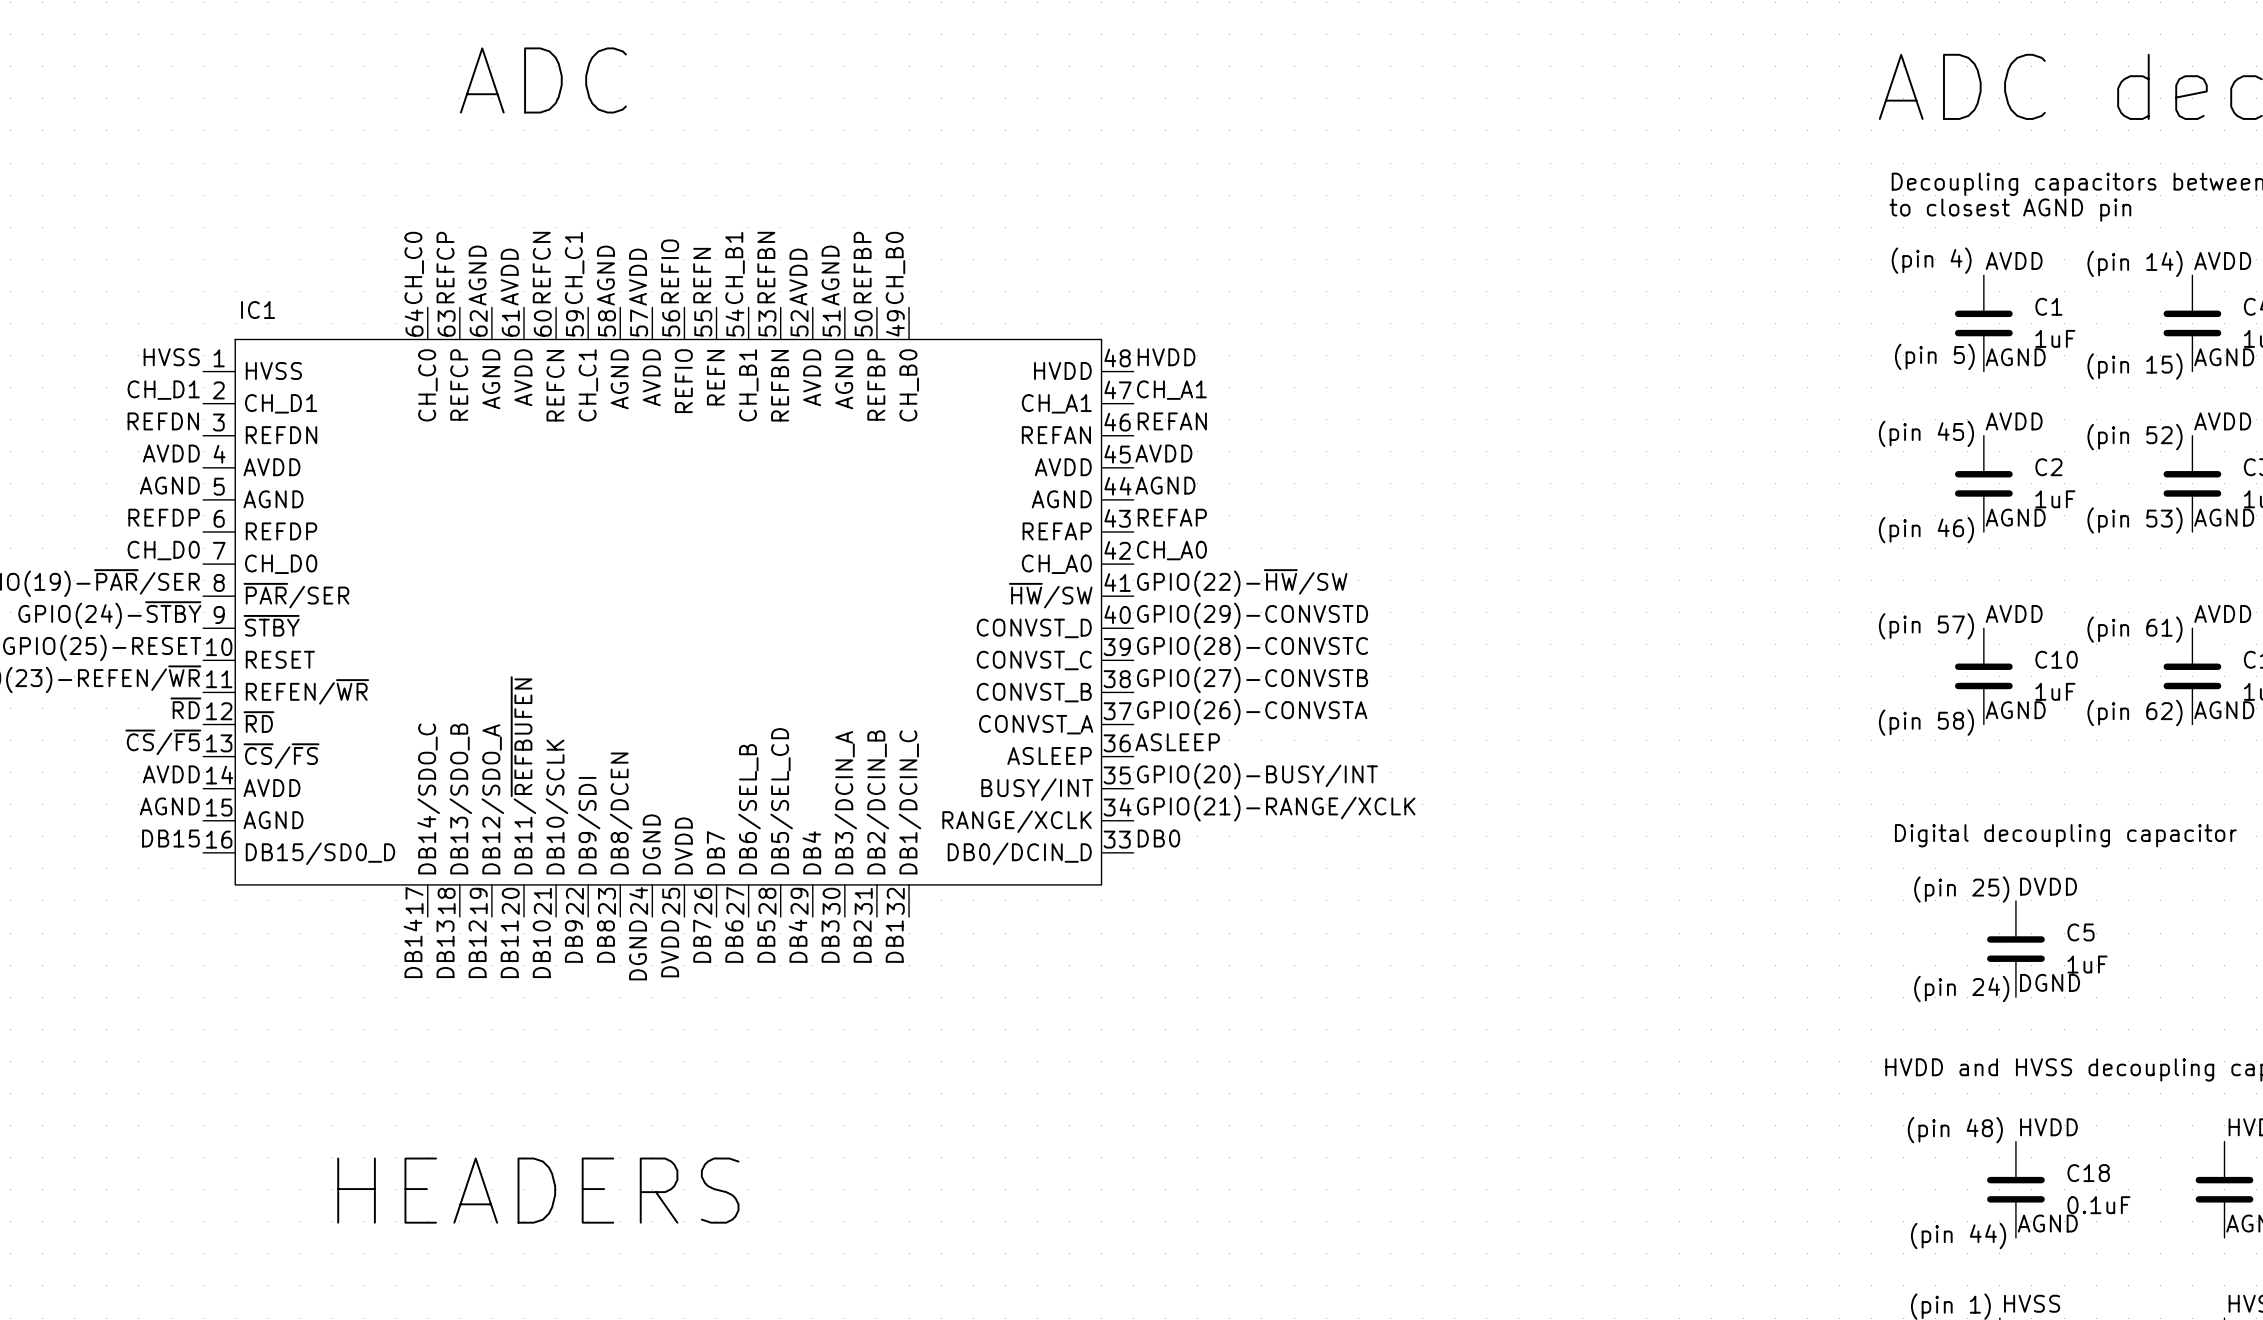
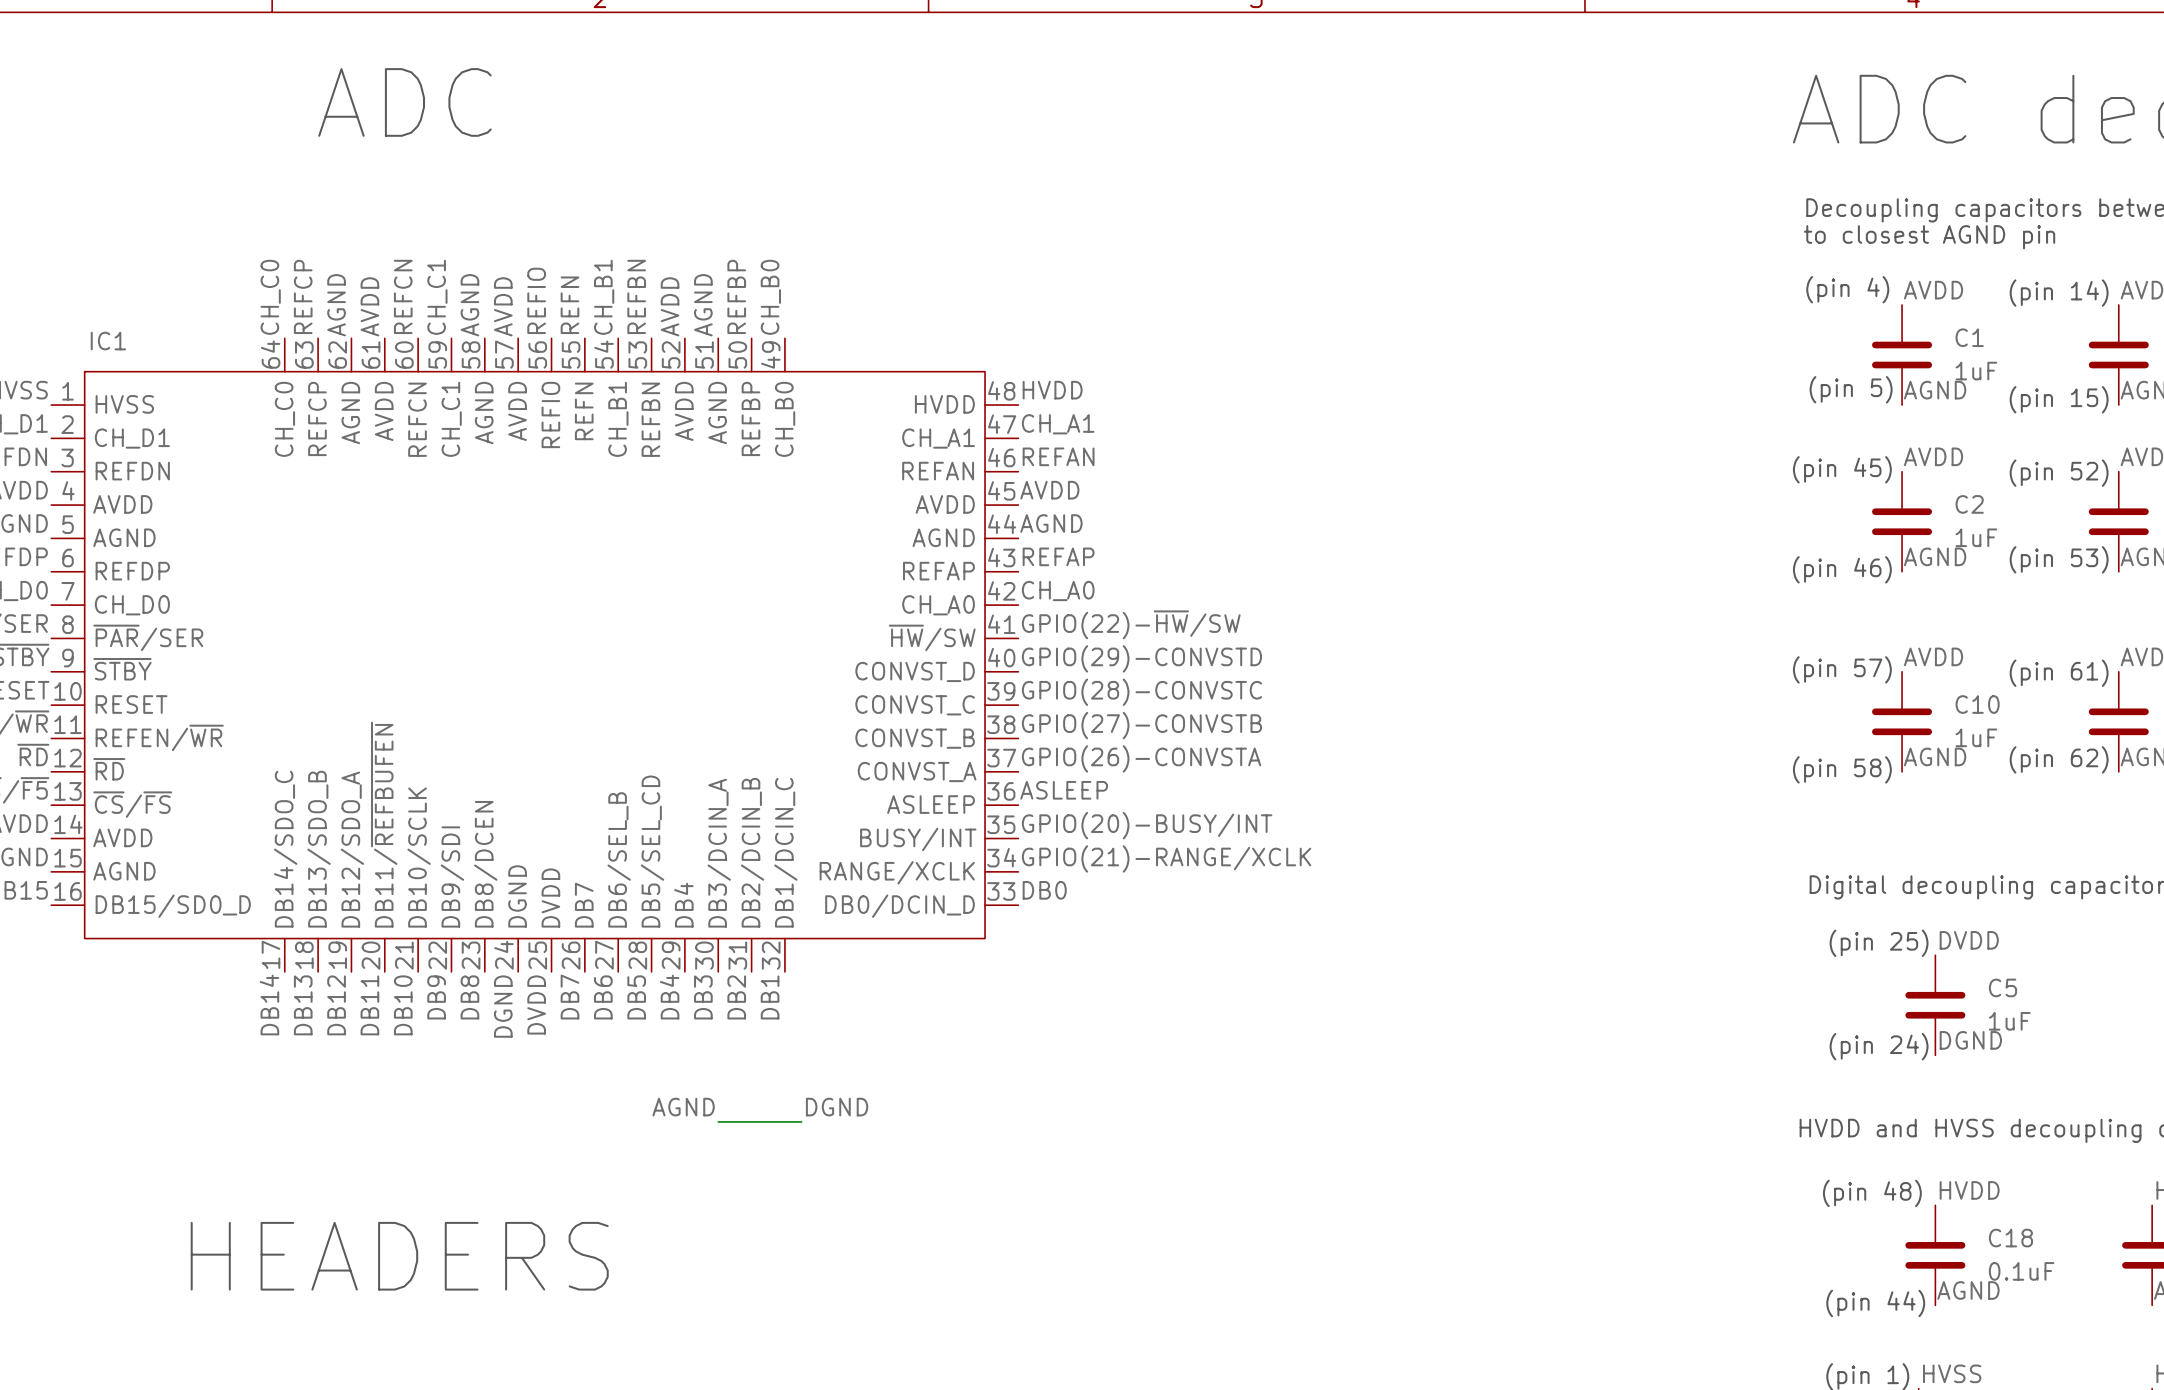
label: none -> AGND (683, 1107)
label: none -> DGND (837, 1107)
wire: none -> (718, 1121) (801, 1121)

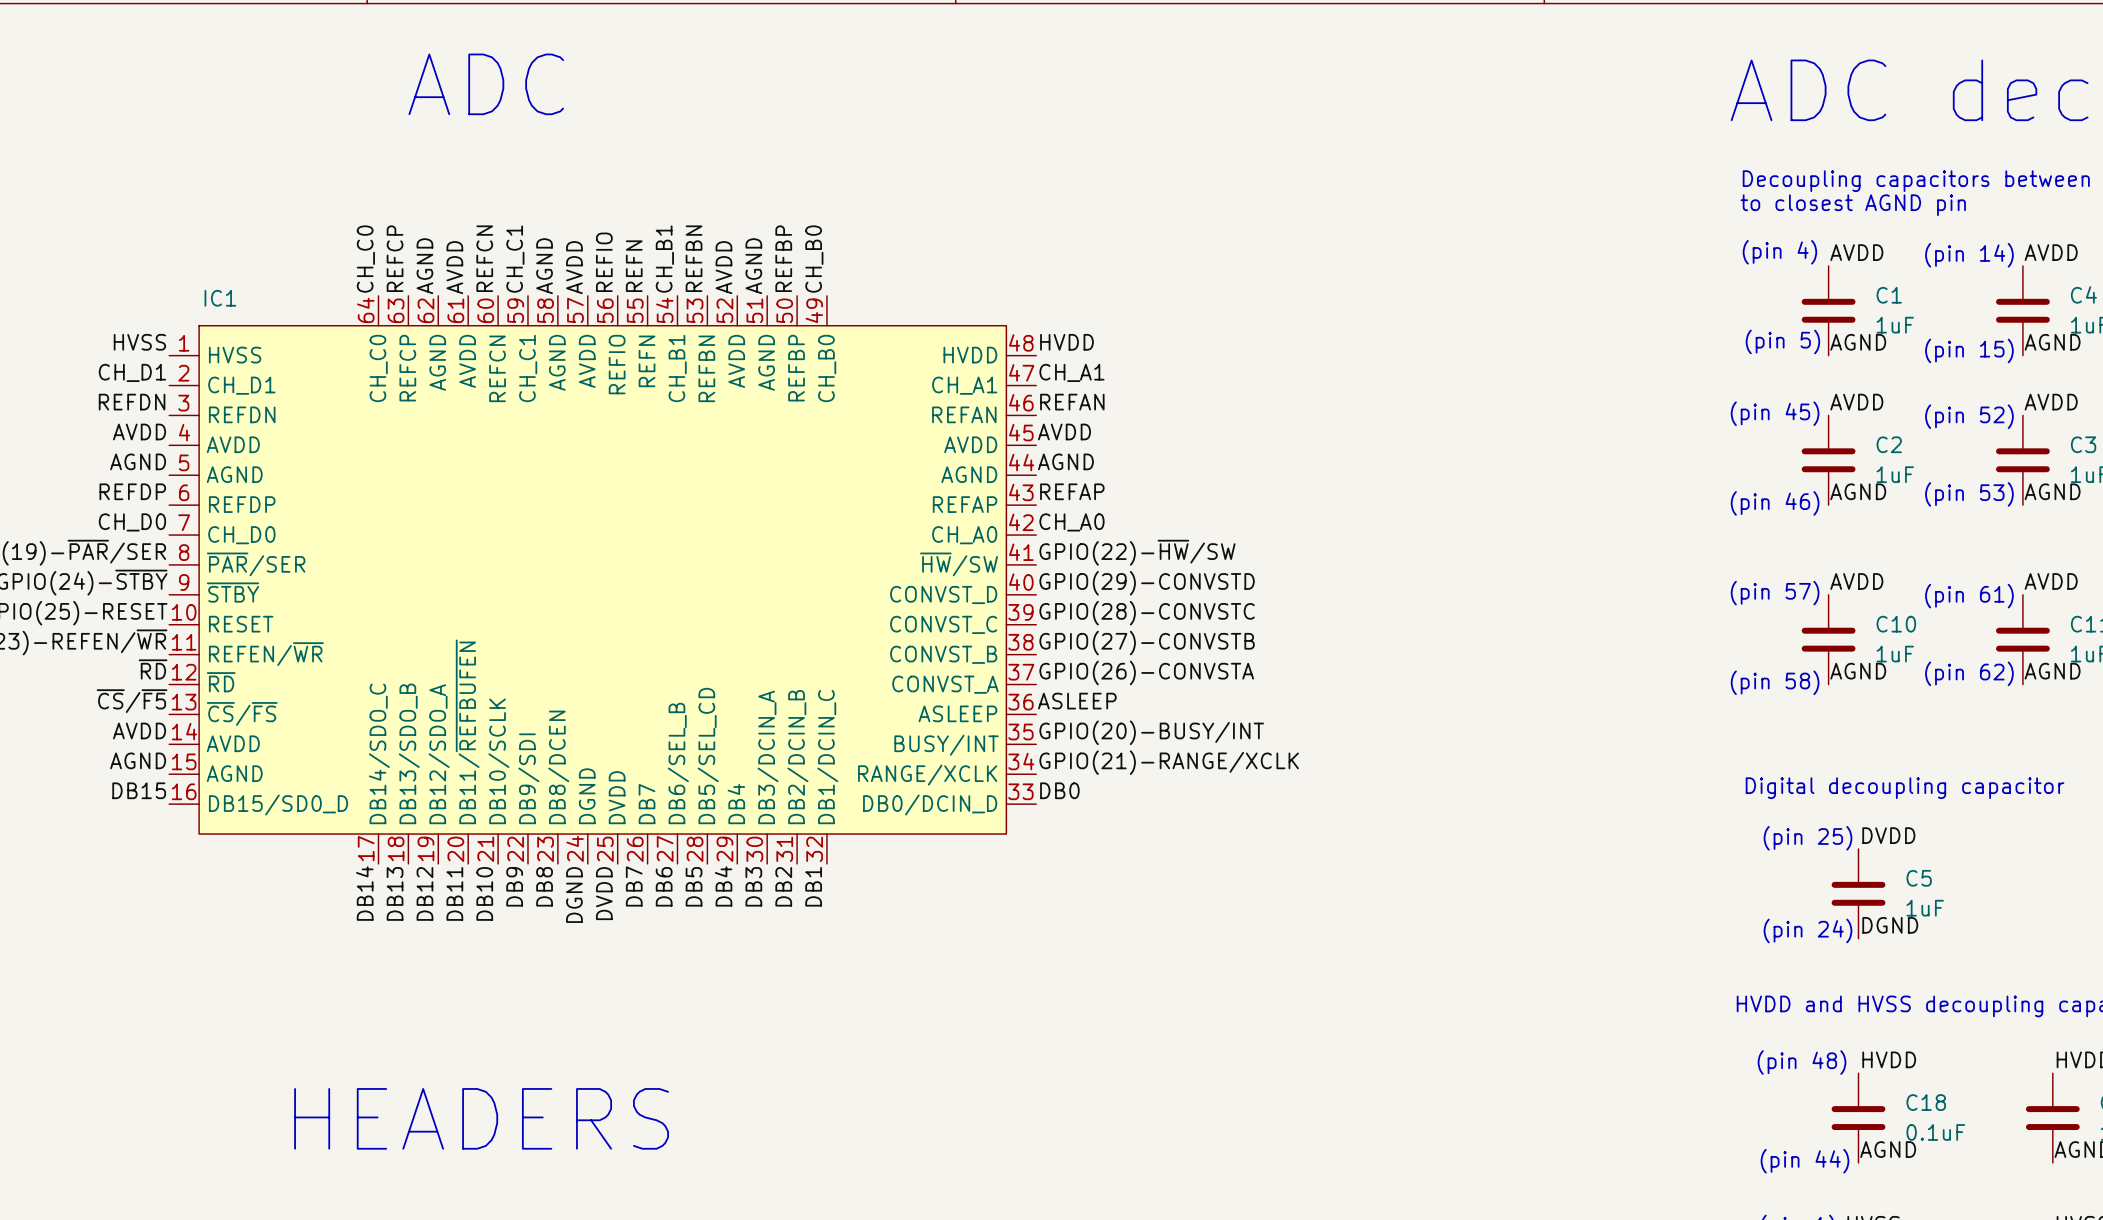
label: AGND (683, 1107) -> none
label: DGND (837, 1107) -> none
wire: (718, 1121) (801, 1121) -> none

